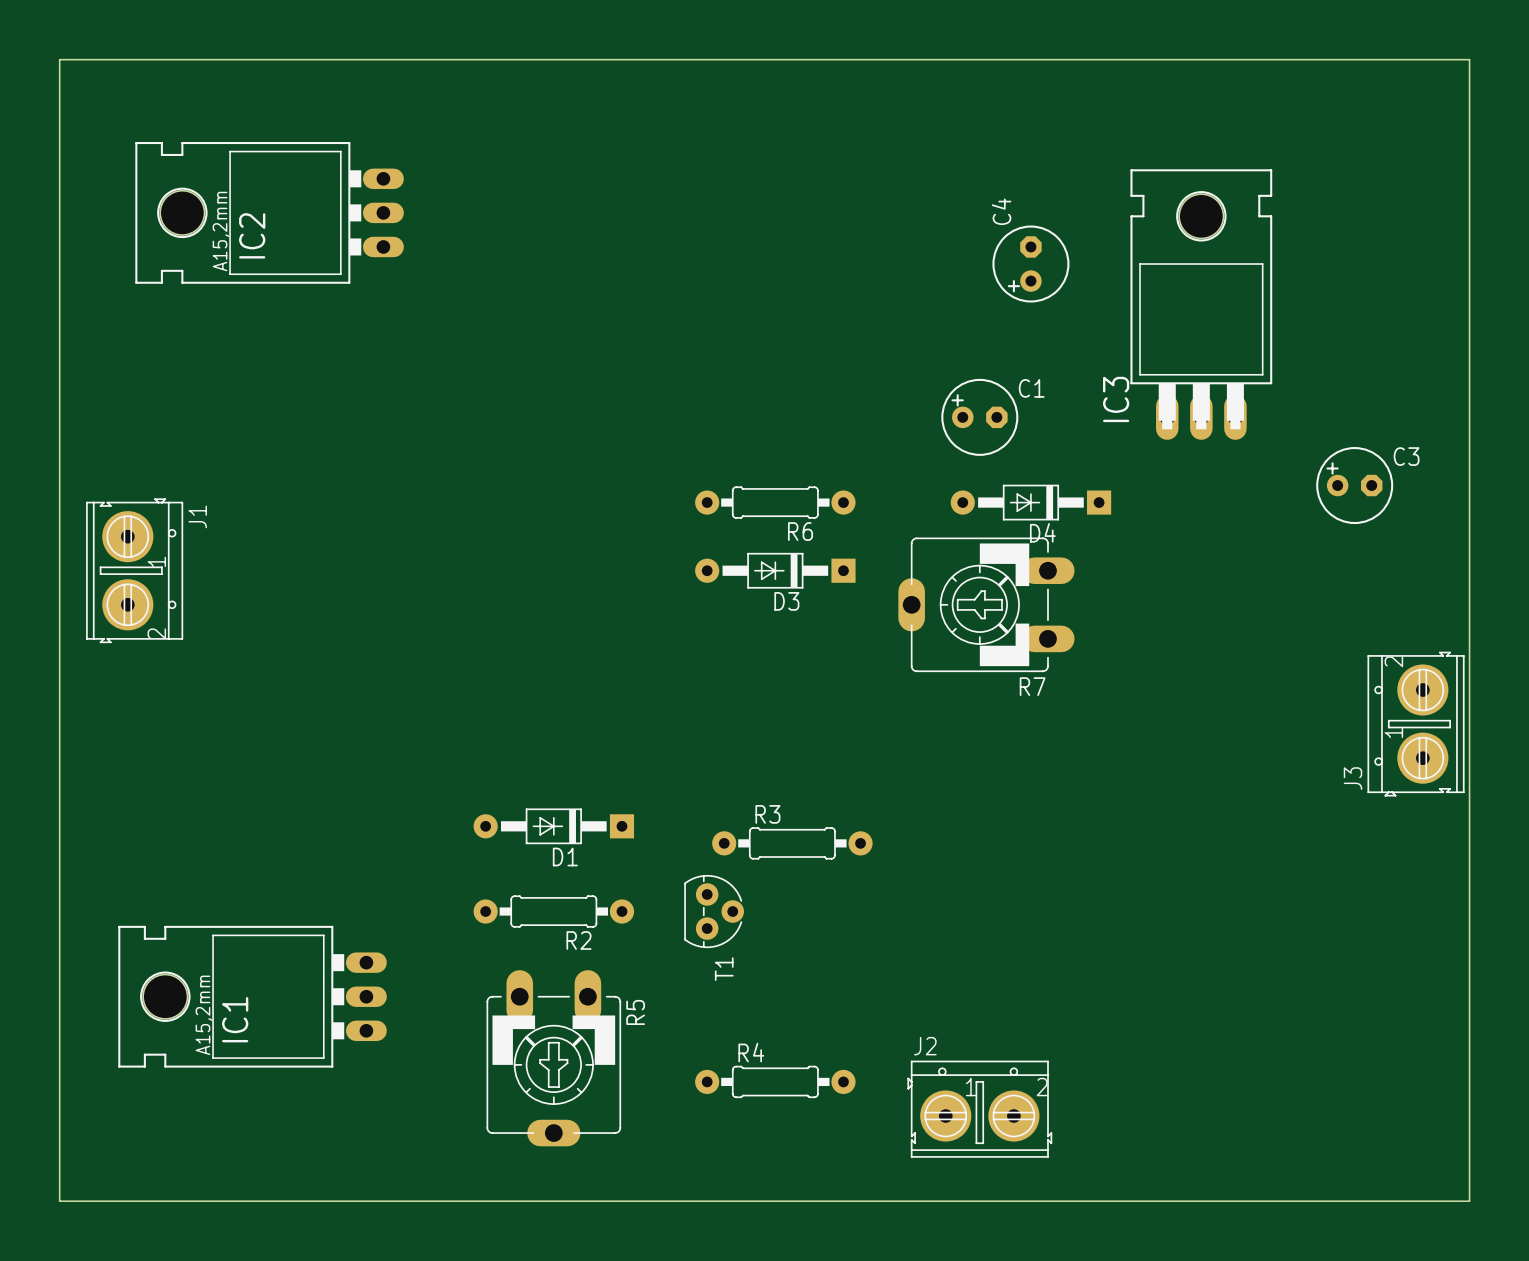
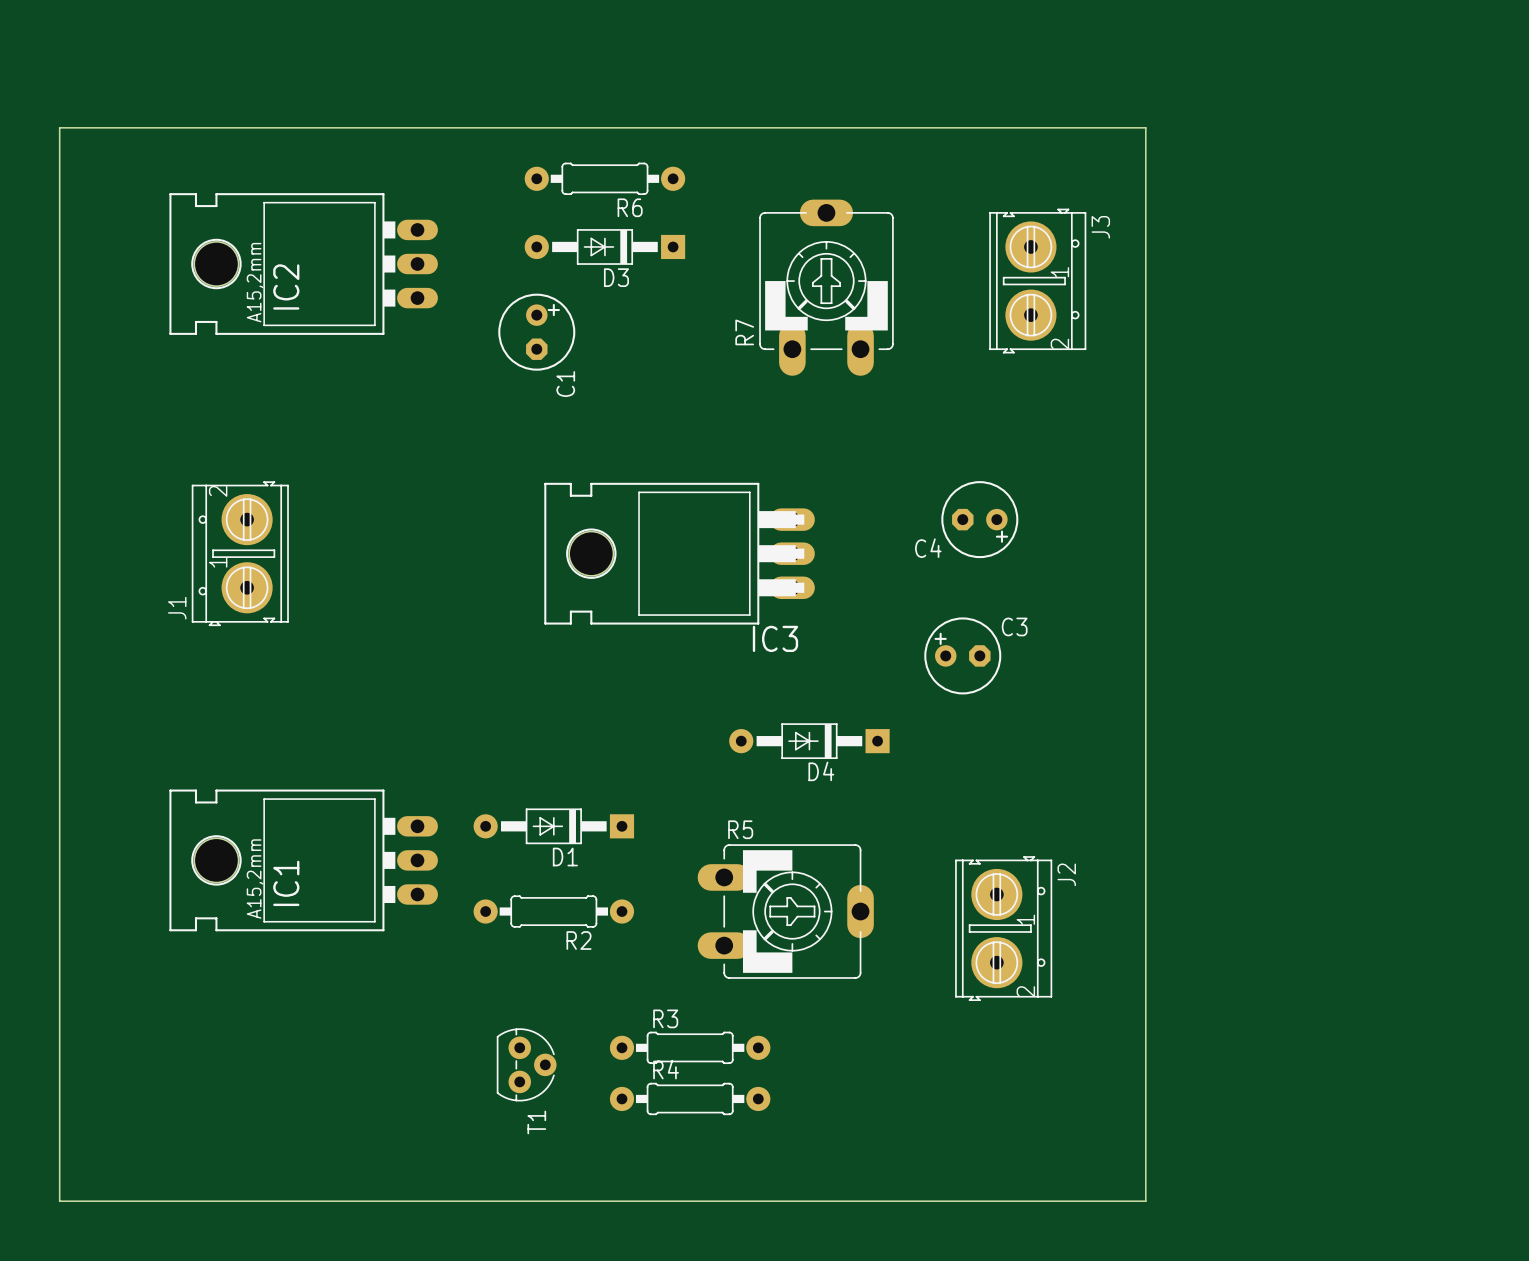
board edge: (59, 127) (59, 59) (1469, 59) (1469, 1201) (1145, 1201) -> (59, 127) (1145, 127) (1145, 1201)
IC2 position: (269, 212) -> (303, 264)
C4 rotation: 0° (1030, 264) -> 90° counterclockwise (979, 519)
C4 position: (1030, 264) -> (979, 519)
IC3 rotation: 0° (1201, 304) -> 90° counterclockwise (679, 553)
IC3 position: (1201, 304) -> (679, 553)
C1 rotation: 0° (979, 417) -> 90° clockwise (536, 332)
C1 position: (979, 417) -> (536, 332)
C3 position: (1354, 485) -> (962, 655)
J1 footprint: [86, 498, 184, 644] -> [191, 481, 289, 627]
R6 position: (775, 502) -> (604, 178)
D4 position: (1030, 502) -> (809, 741)
J1 name position: J1 (197, 516) -> J1 (177, 608)
D3 position: (775, 570) -> (604, 246)
R7 rotation: 0° (986, 604) -> 90° clockwise (826, 287)
R7 position: (986, 604) -> (826, 287)
J3 footprint: [1367, 651, 1465, 797] -> [989, 208, 1087, 354]
J3 name position: J3 (1352, 778) -> J3 (1100, 227)
R3 position: (792, 843) -> (690, 1047)
T1 position: (714, 911) -> (526, 1064)
IC1 position: (252, 996) -> (303, 860)
J2 name position: J2 (925, 1046) -> J2 (1066, 874)
R5 rotation: 0° (553, 1058) -> 90° counterclockwise (785, 911)
R5 position: (553, 1058) -> (785, 911)
J2 footprint: [907, 1060, 1053, 1158] -> [955, 856, 1053, 1001]
R4 position: (775, 1081) -> (690, 1098)

